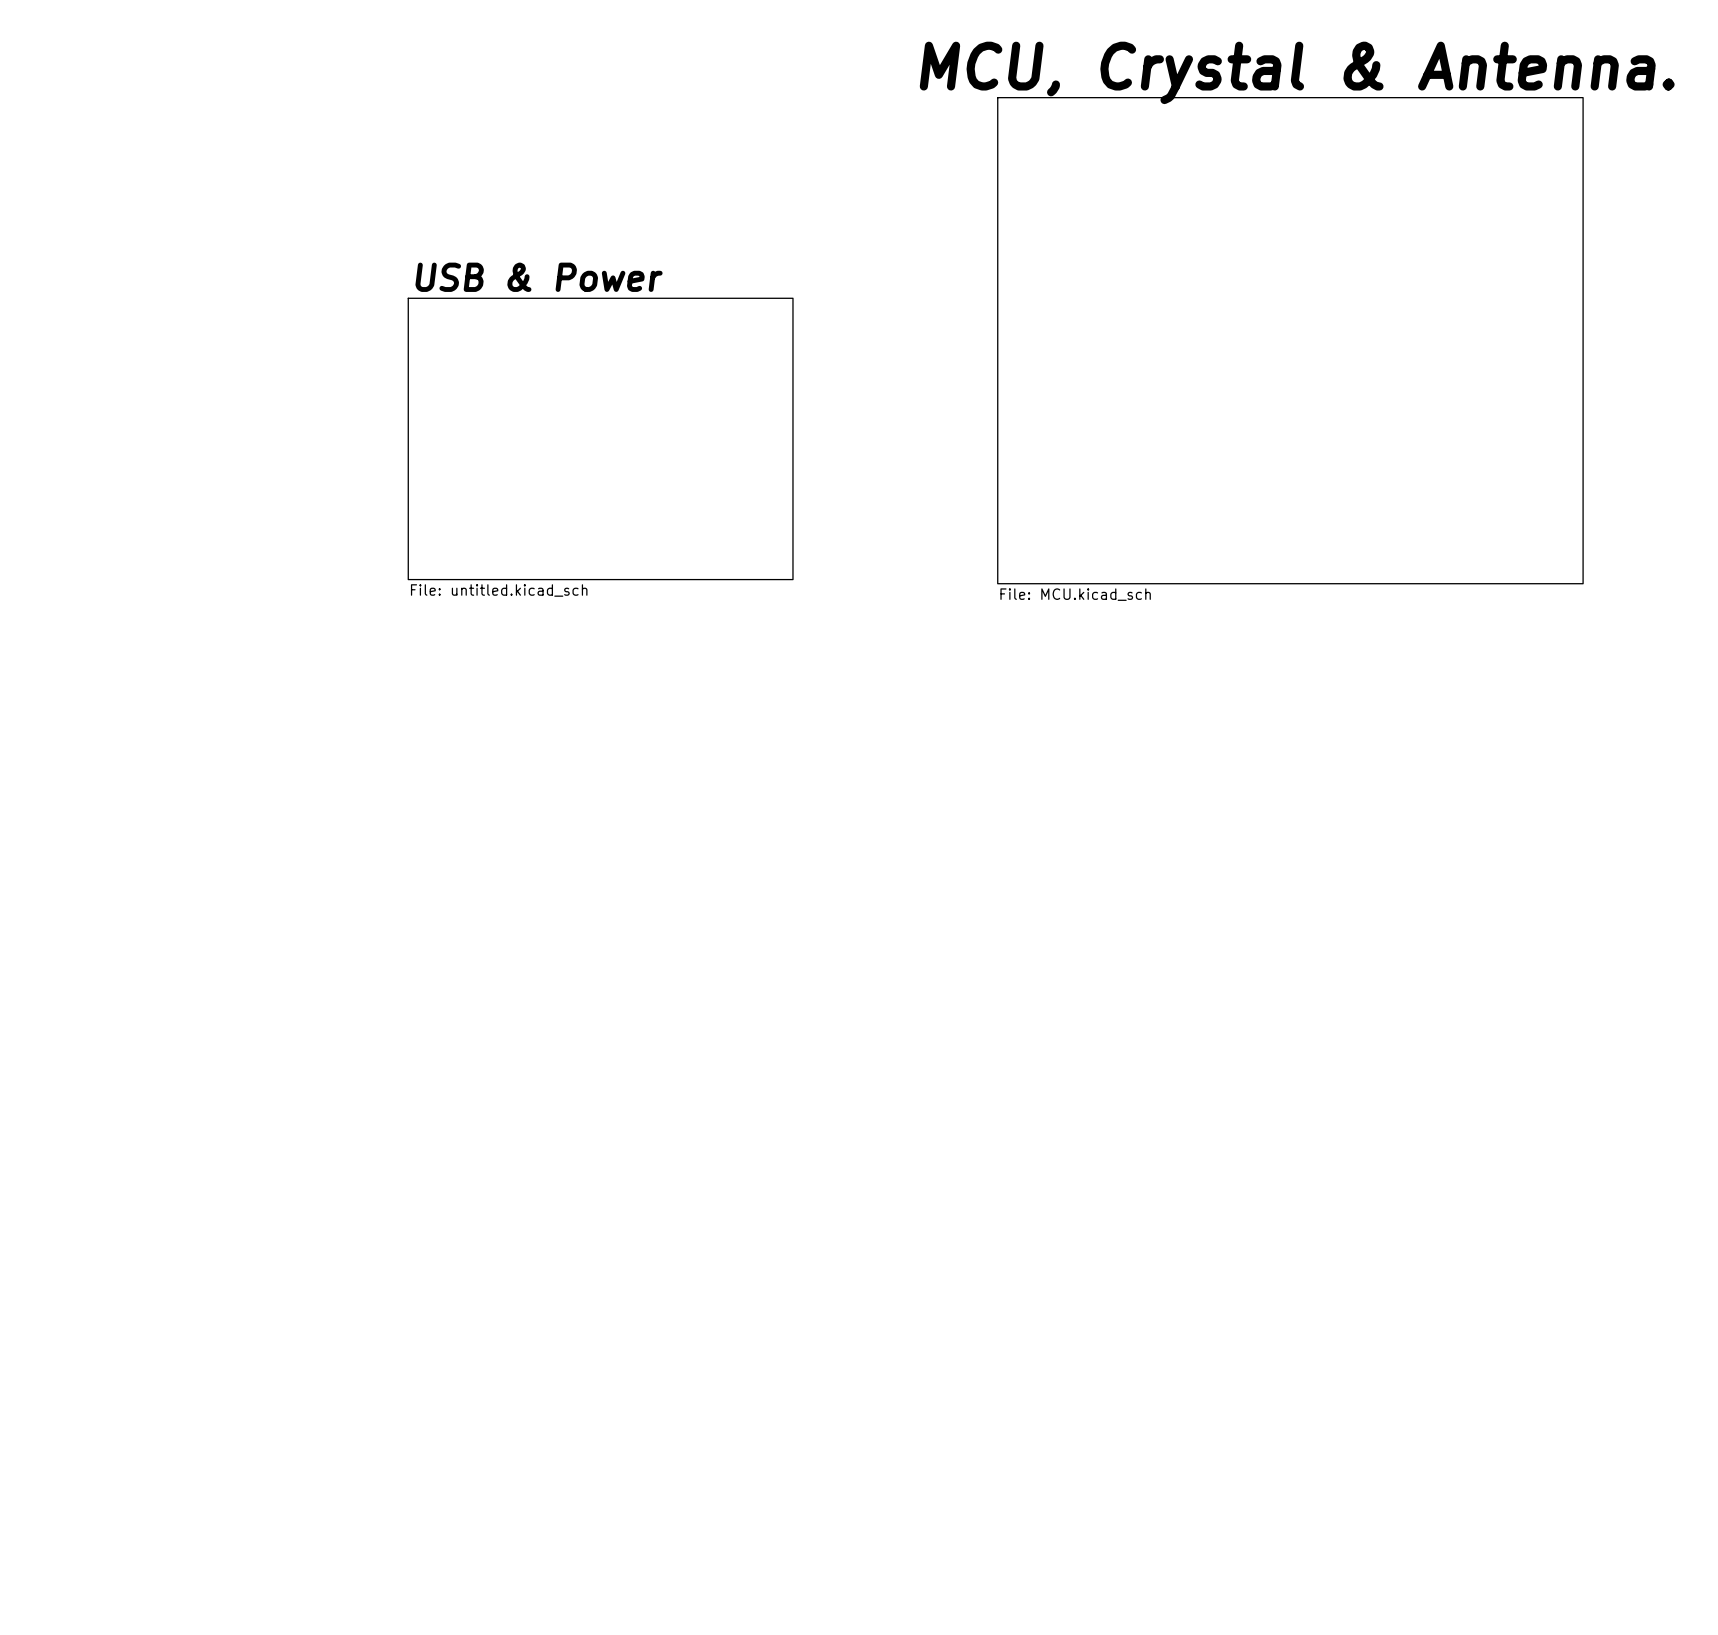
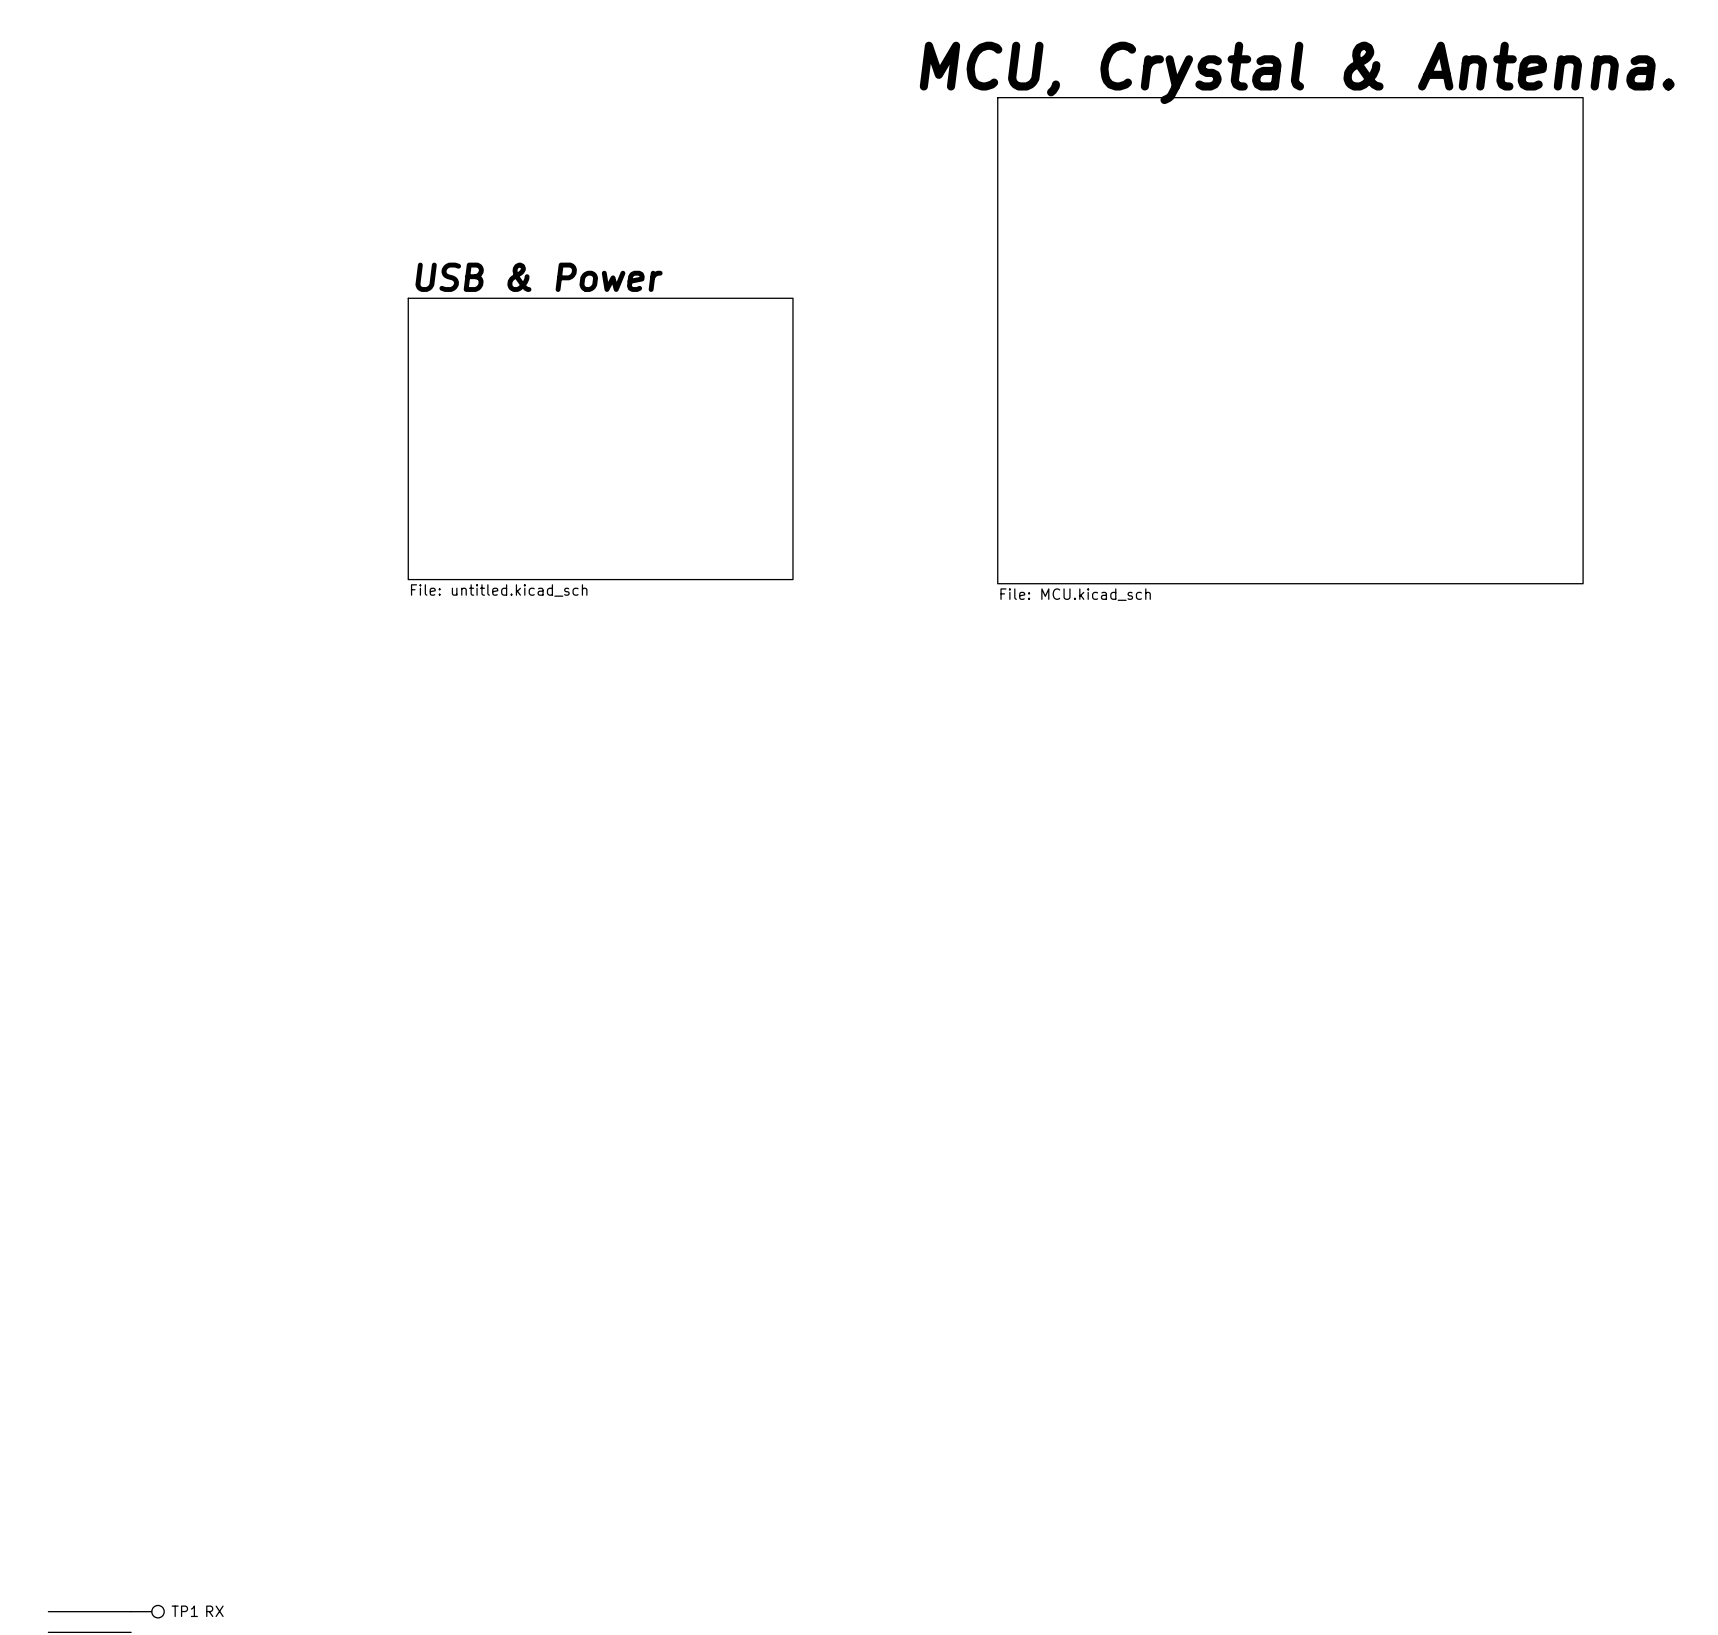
wire: none -> (48, 1611) (131, 1611)
TP1: none -> RX (147, 1611)
wire: none -> (48, 1632) (131, 1632)

